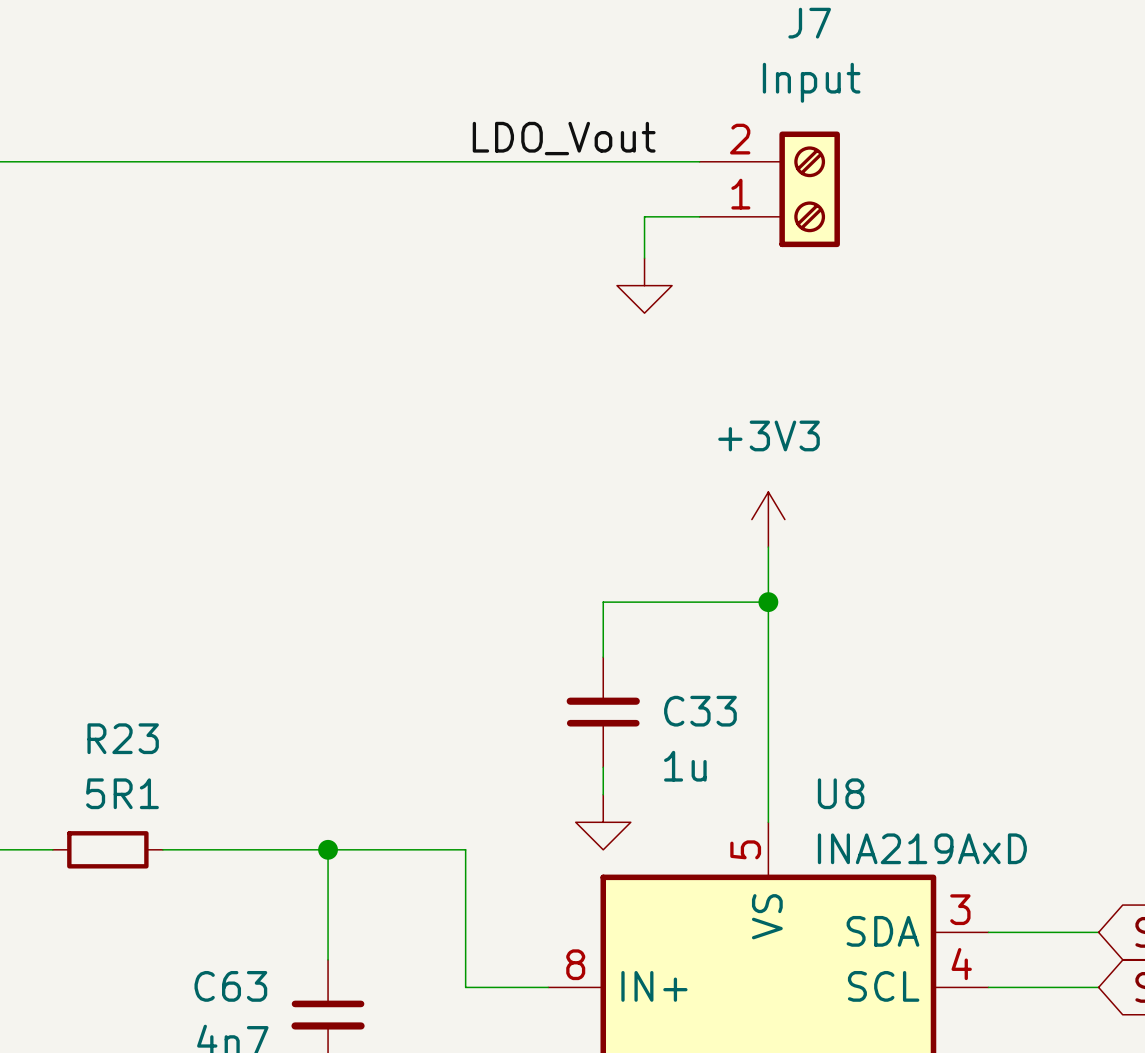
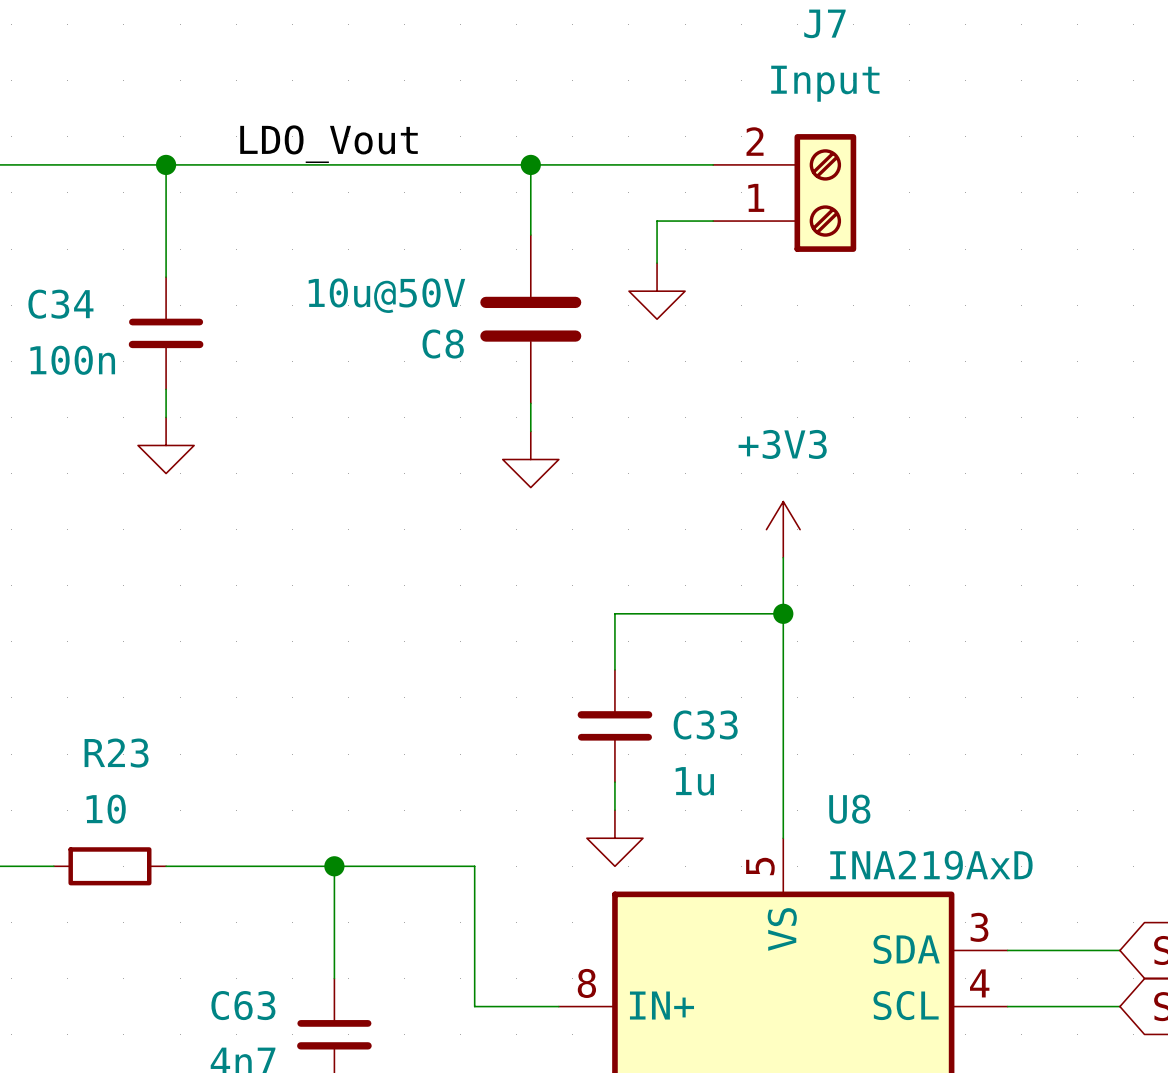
label position: LDO_Vout (564, 138) -> LDO_Vout (329, 144)
wire: none -> (166, 164) (166, 277)
junction: none -> (166, 164)
wire: none -> (530, 164) (530, 235)
junction: none -> (530, 164)
C8: none -> 10u@50V (530, 319)
C34: none -> 100n (166, 333)
wire: none -> (166, 389) (166, 417)
wire: none -> (530, 403) (530, 431)
power symbol: none -> (166, 445)
power symbol: none -> (530, 459)
R23 value: 5R1 (122, 793) -> 10 (106, 809)

